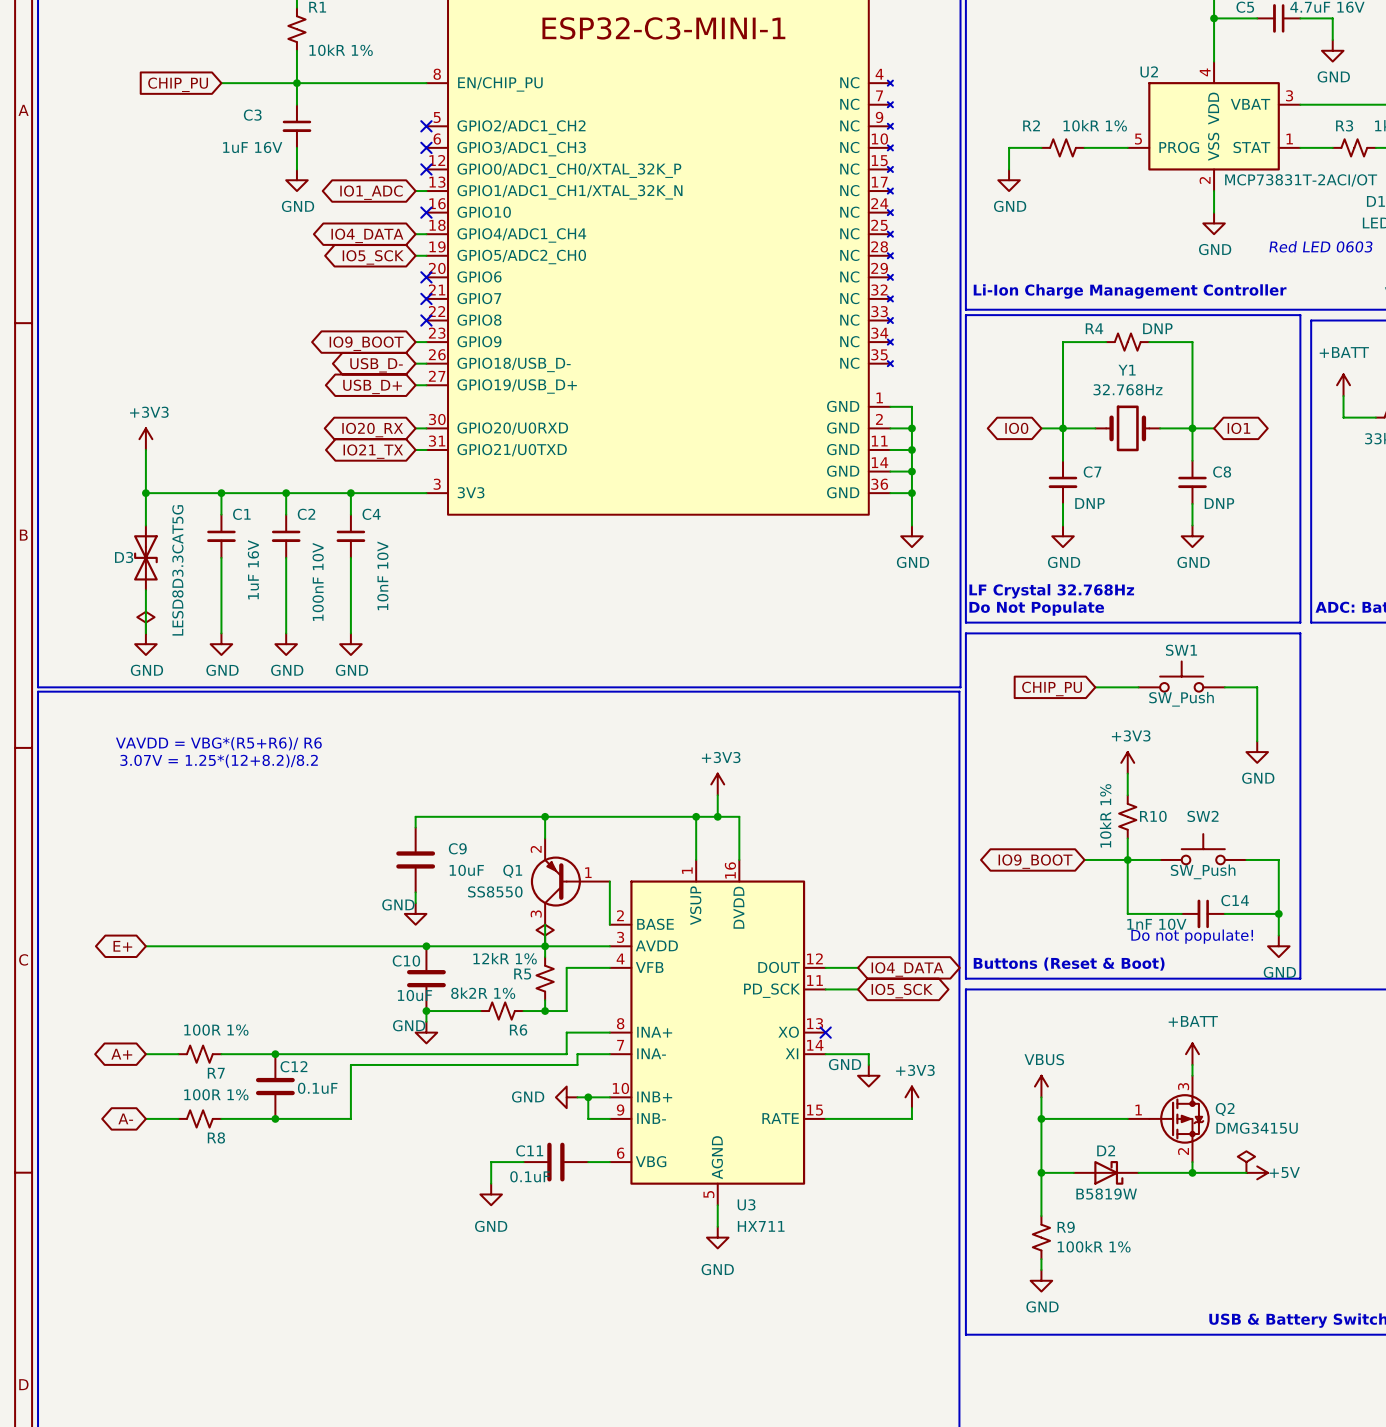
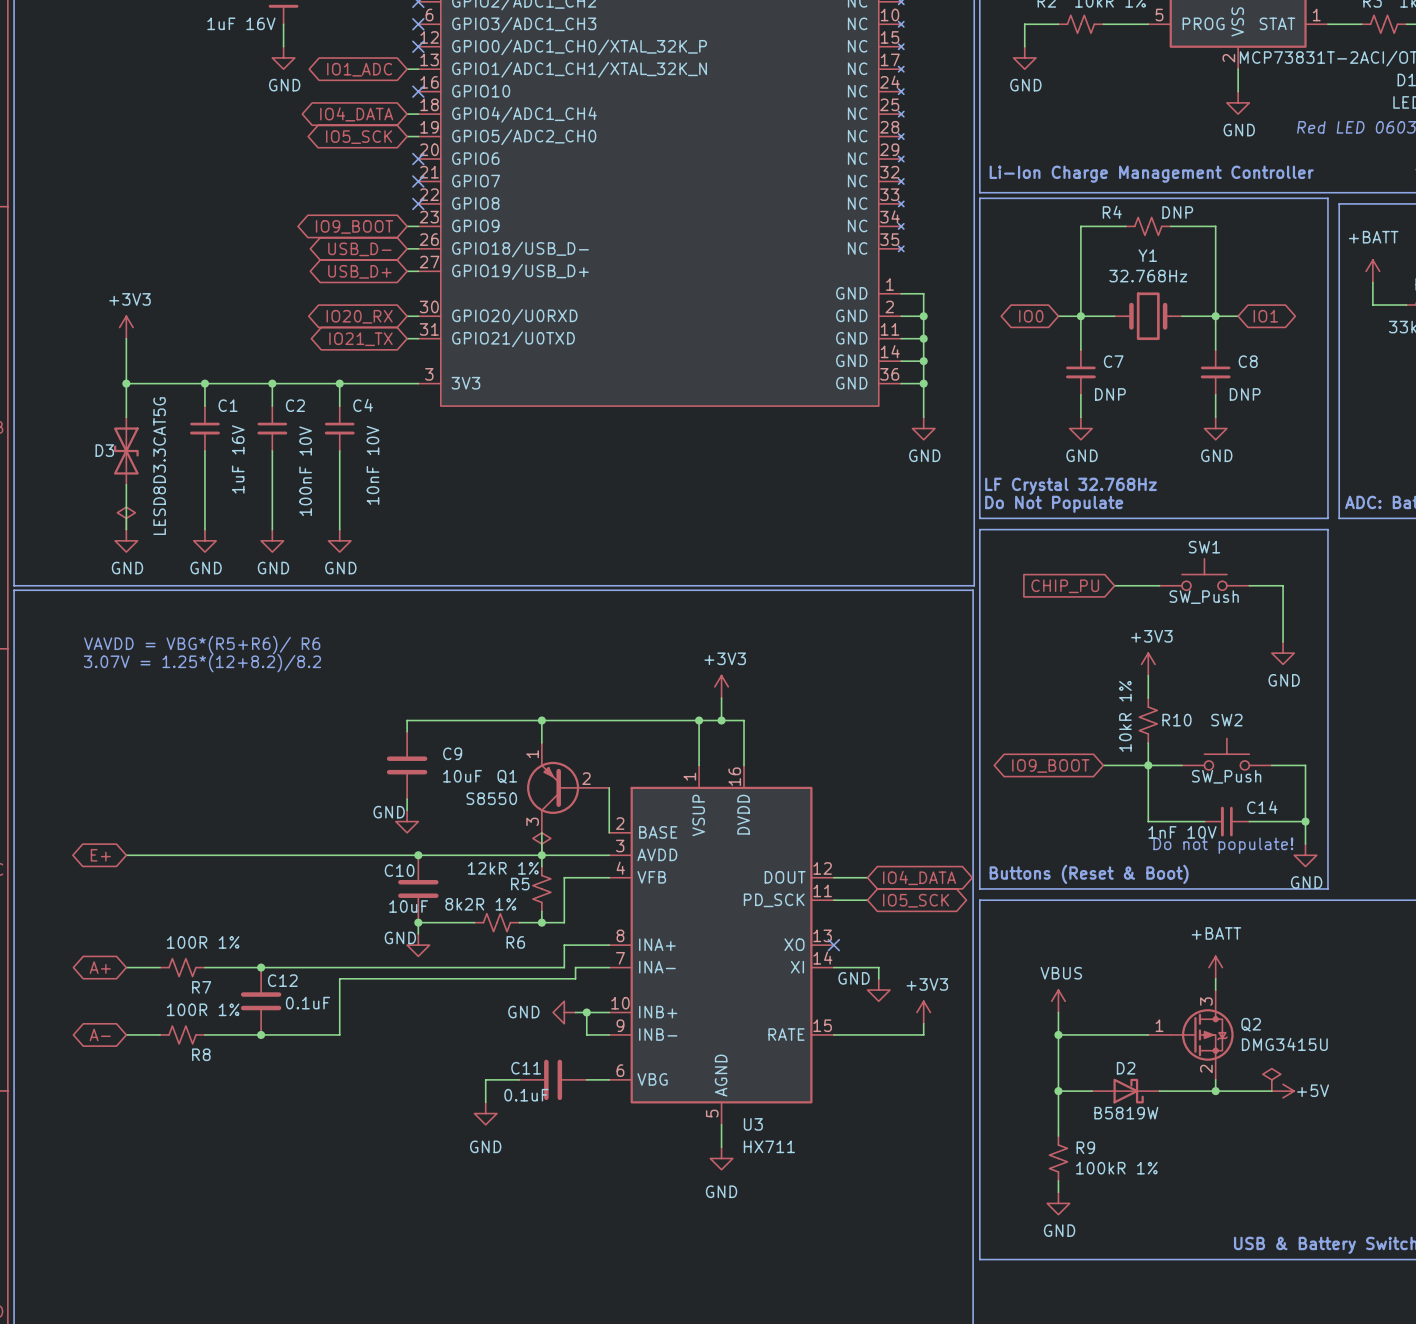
Q1 pin number: 2 (536, 849) -> 1 (532, 754)
Q1 pin number: 1 (588, 872) -> 2 (586, 778)
Q1 value: SS8550 (495, 891) -> S8550 (491, 798)

